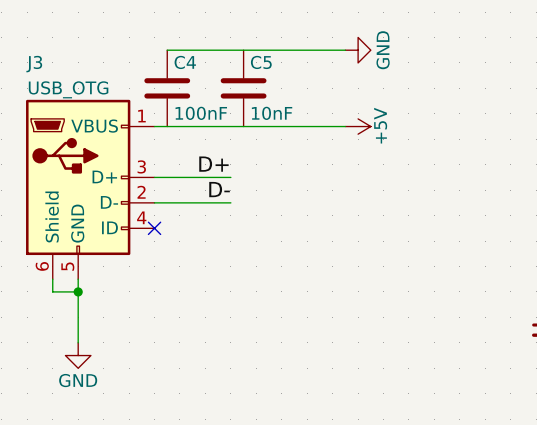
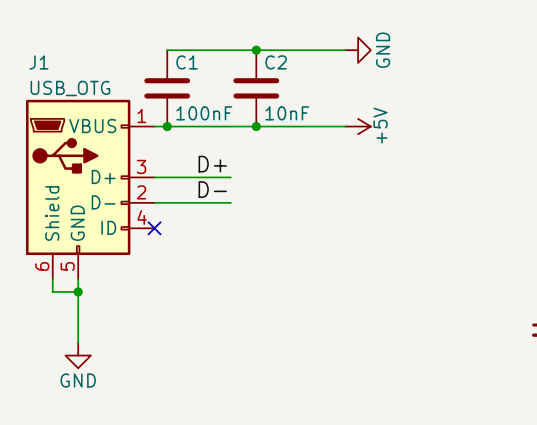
junction: none -> (256, 50)
C4 name: C4 (185, 62) -> C1 (187, 62)
J3 name: J3 (34, 64) -> J1 (38, 62)
C5: 10nF (243, 88) -> none
C2: none -> 10nF (256, 88)
junction: none -> (167, 126)
junction: none -> (256, 126)

